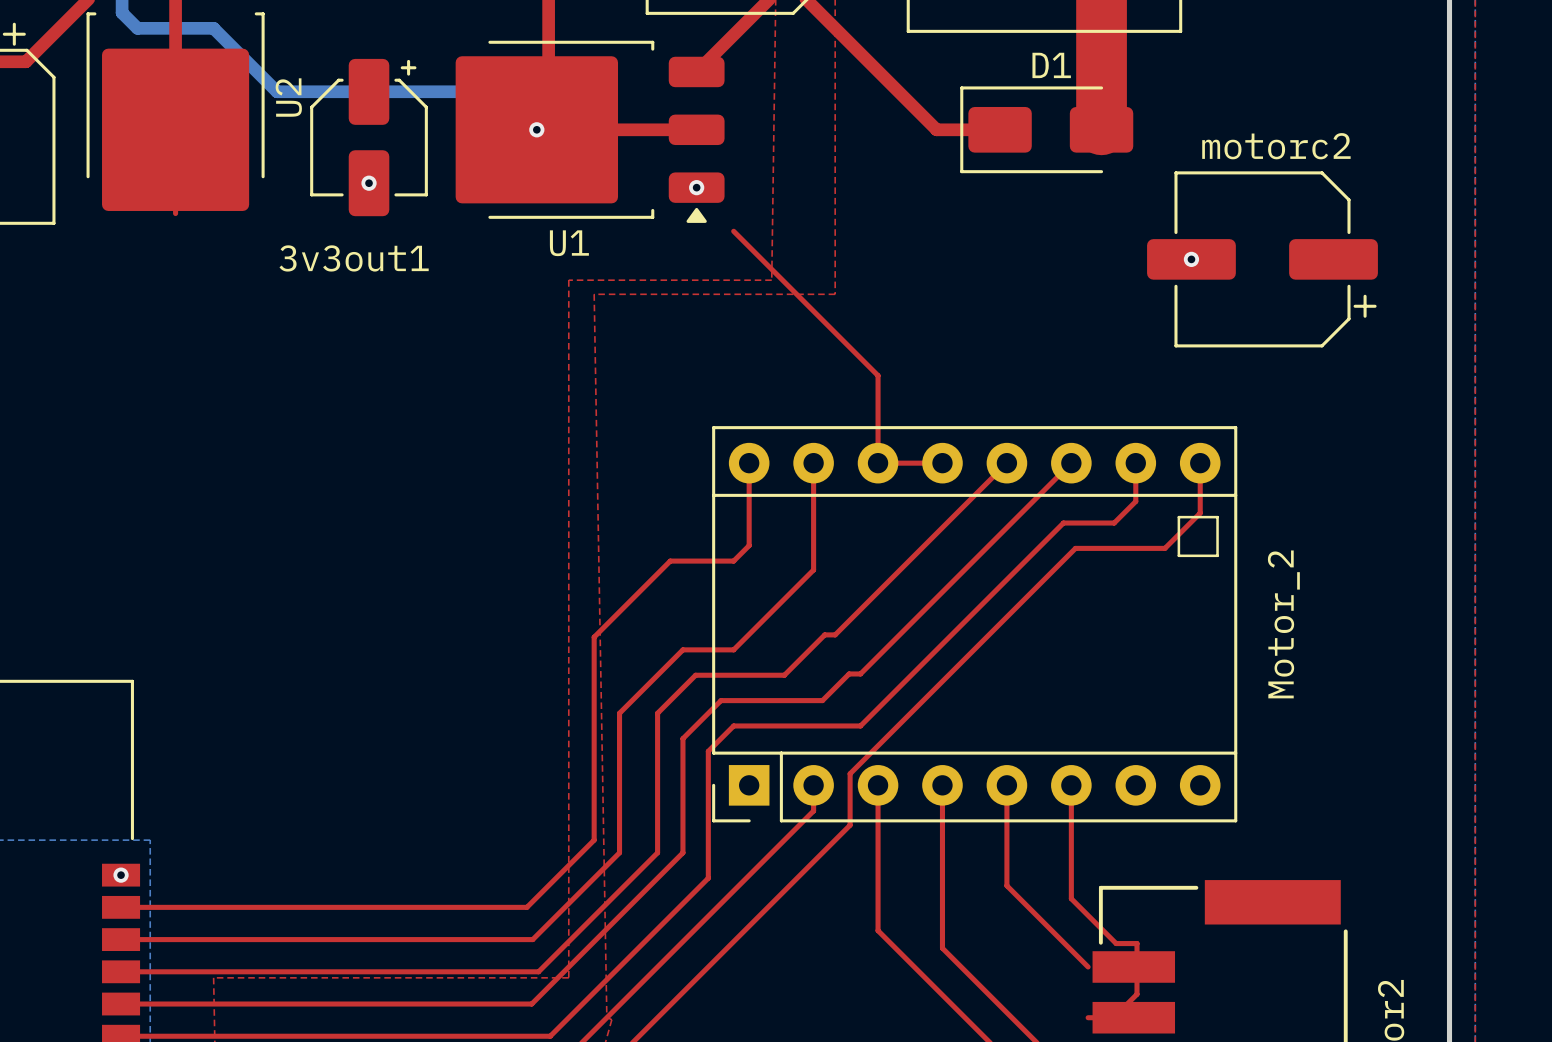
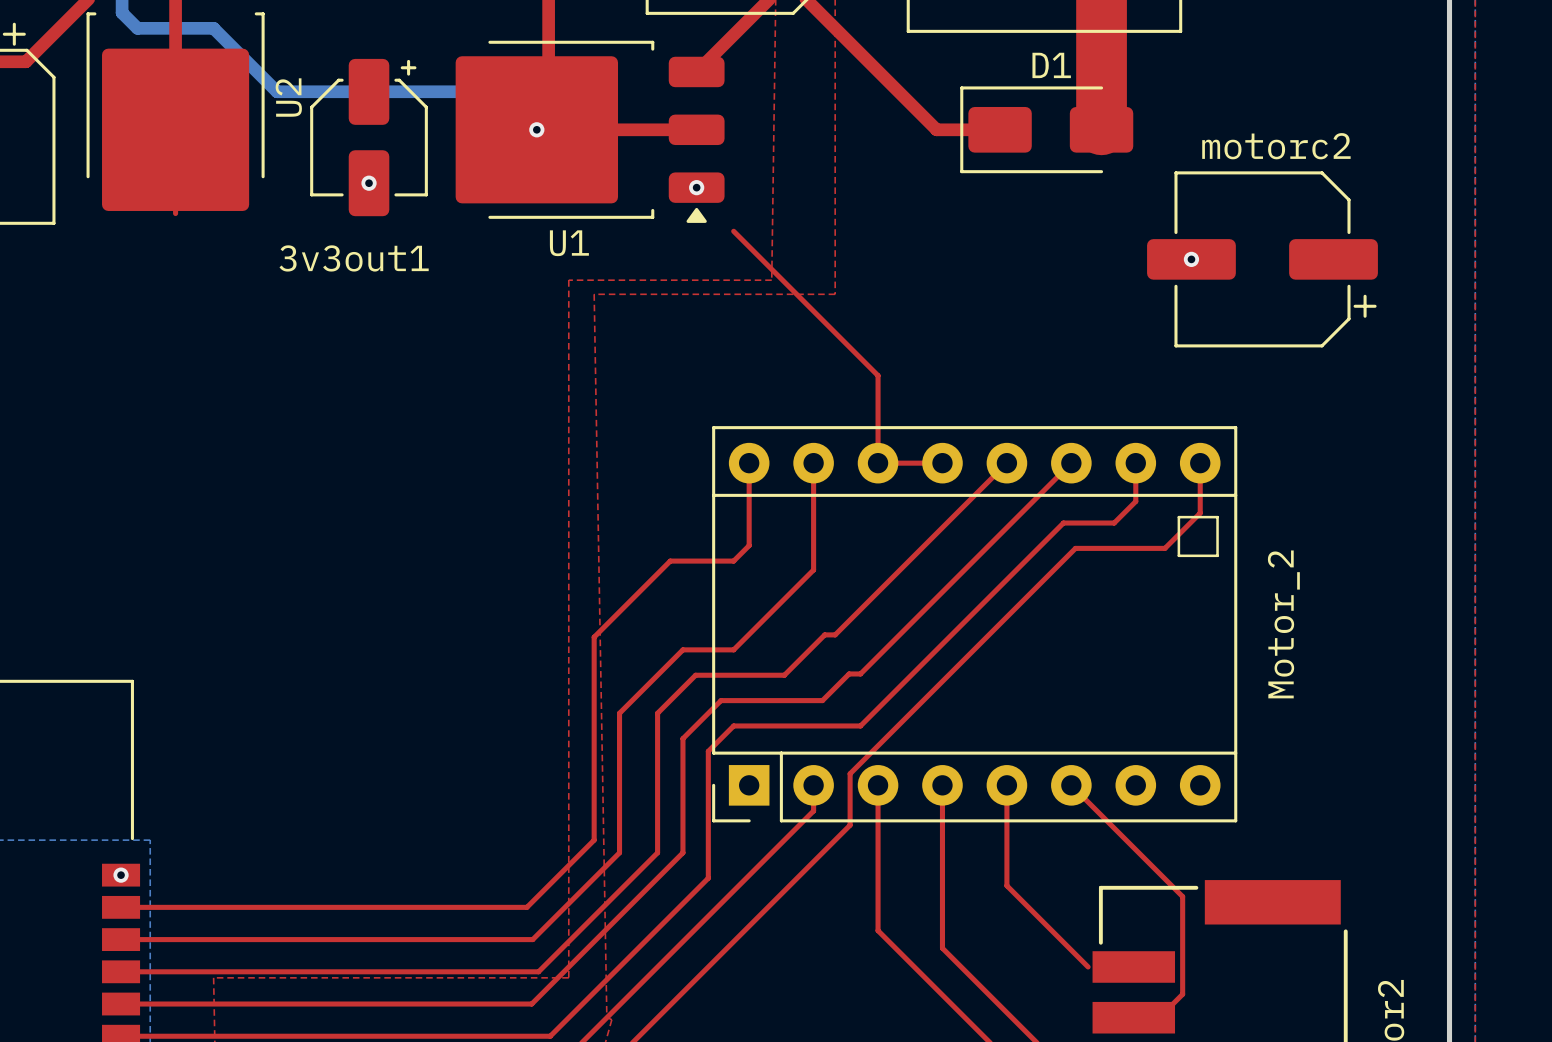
top track: (1071, 785) (1071, 898) (1116, 943) (1137, 943) (1137, 994) (1113, 1017) (1088, 1017) -> (1071, 785) (1182, 896) (1182, 994) (1159, 1017) (1133, 1017)

